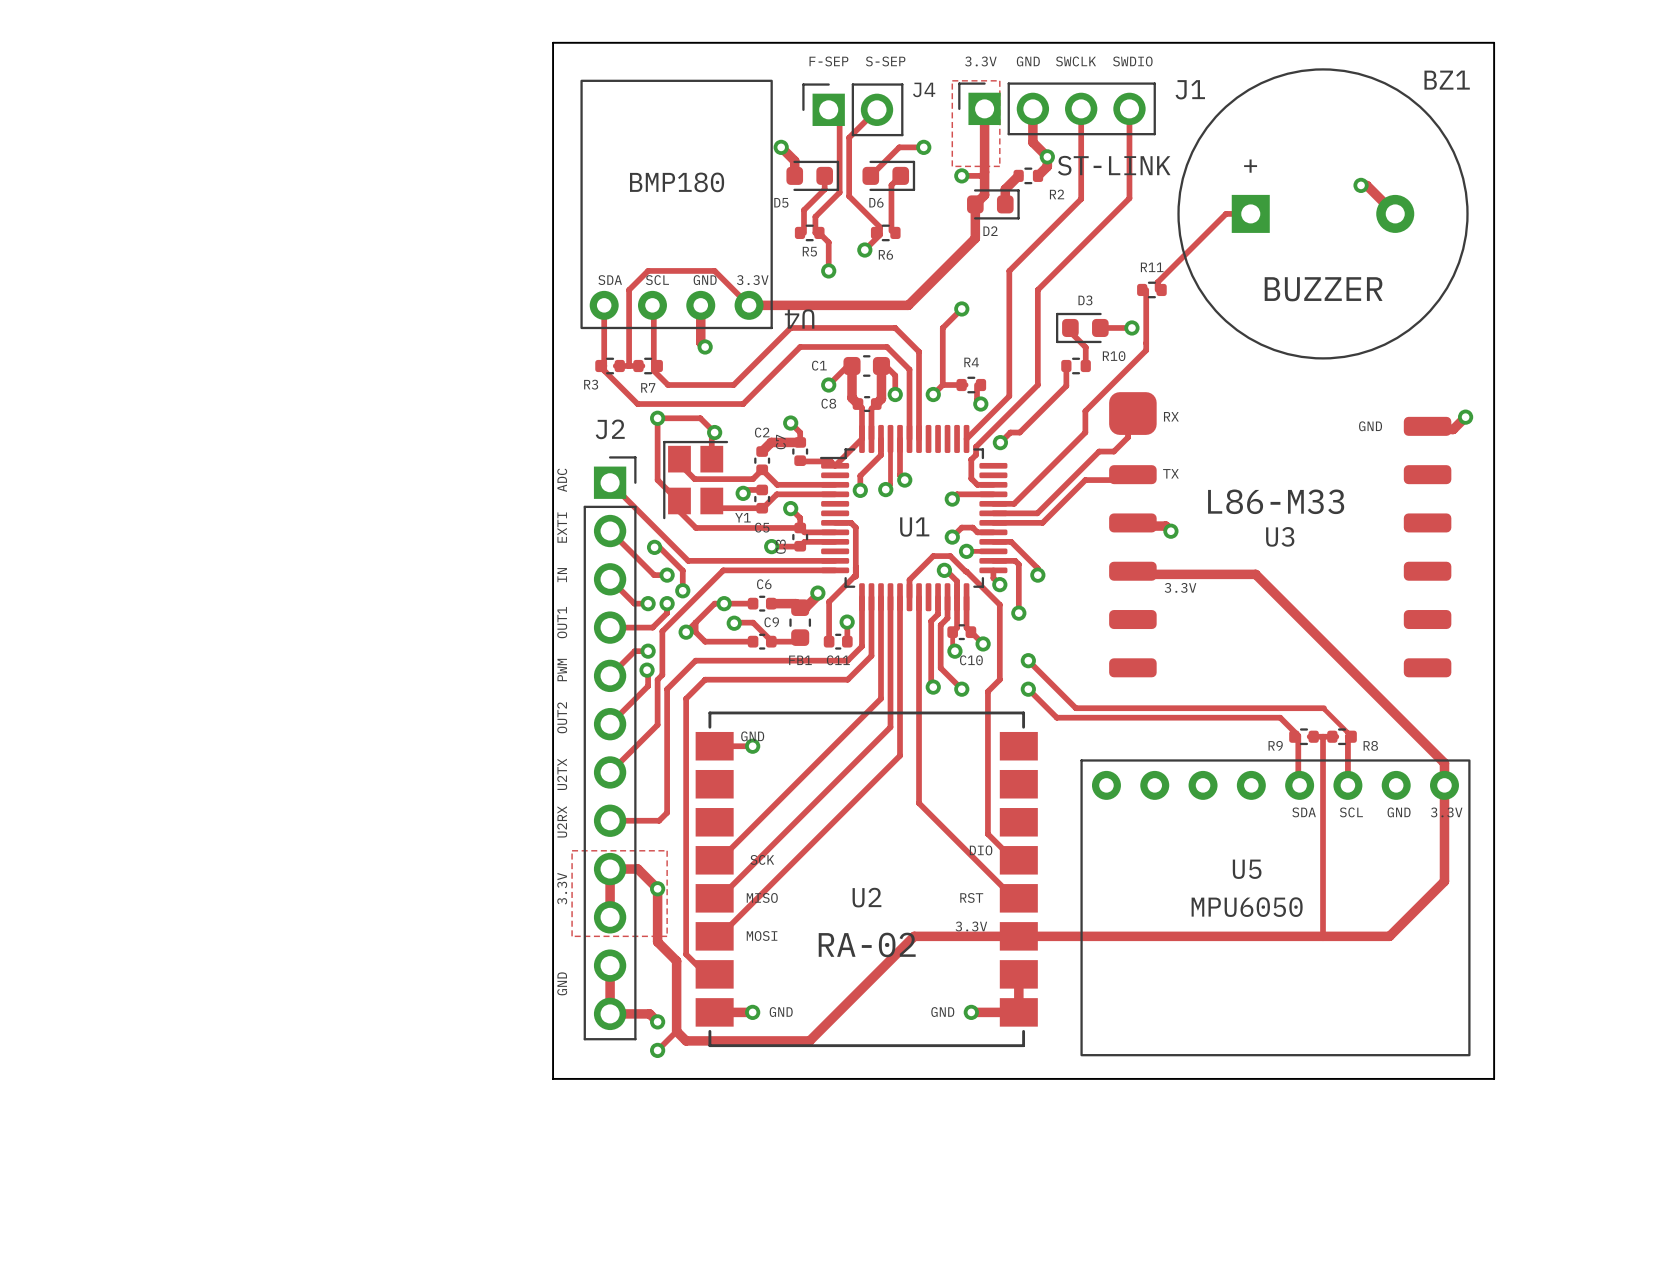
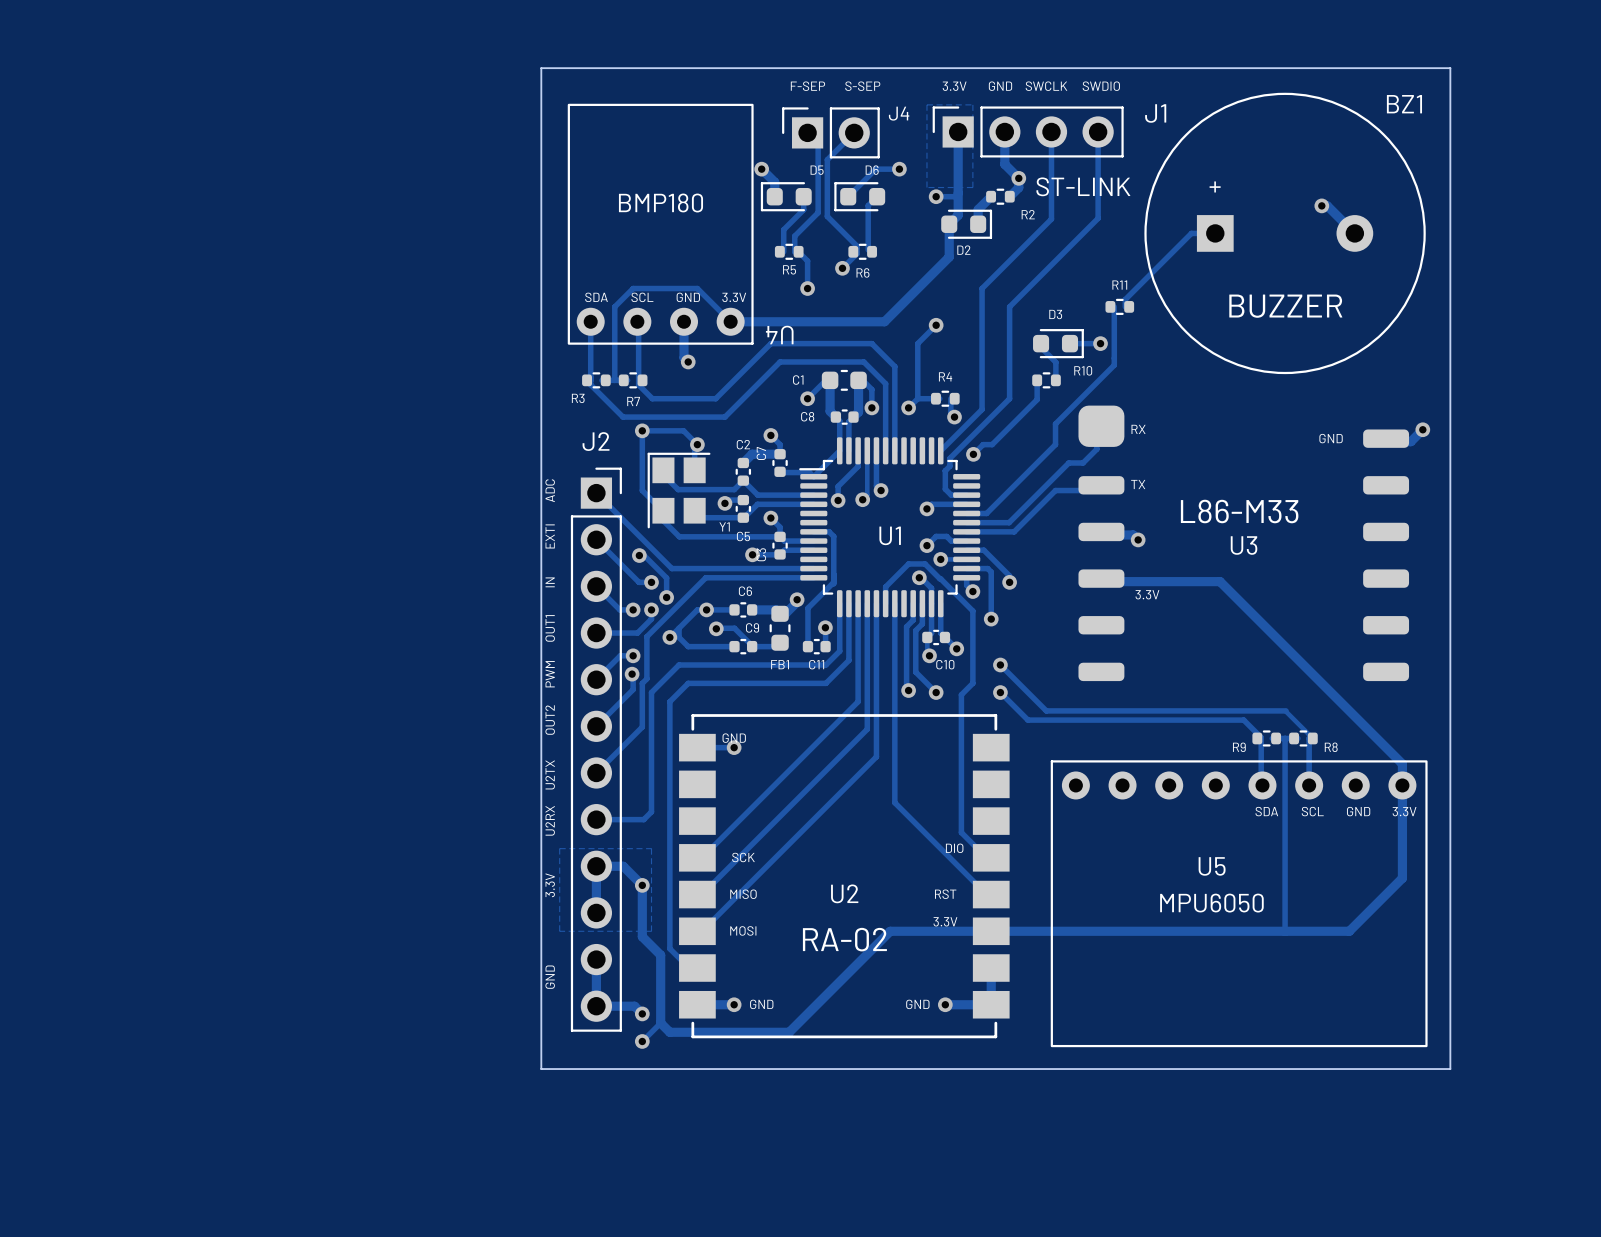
D5 rotation: 0° (812, 175) -> 180° (786, 196)
D6 rotation: 0° (888, 175) -> 180° (859, 196)
D3 rotation: 0° (1082, 327) -> 180° (1058, 343)

